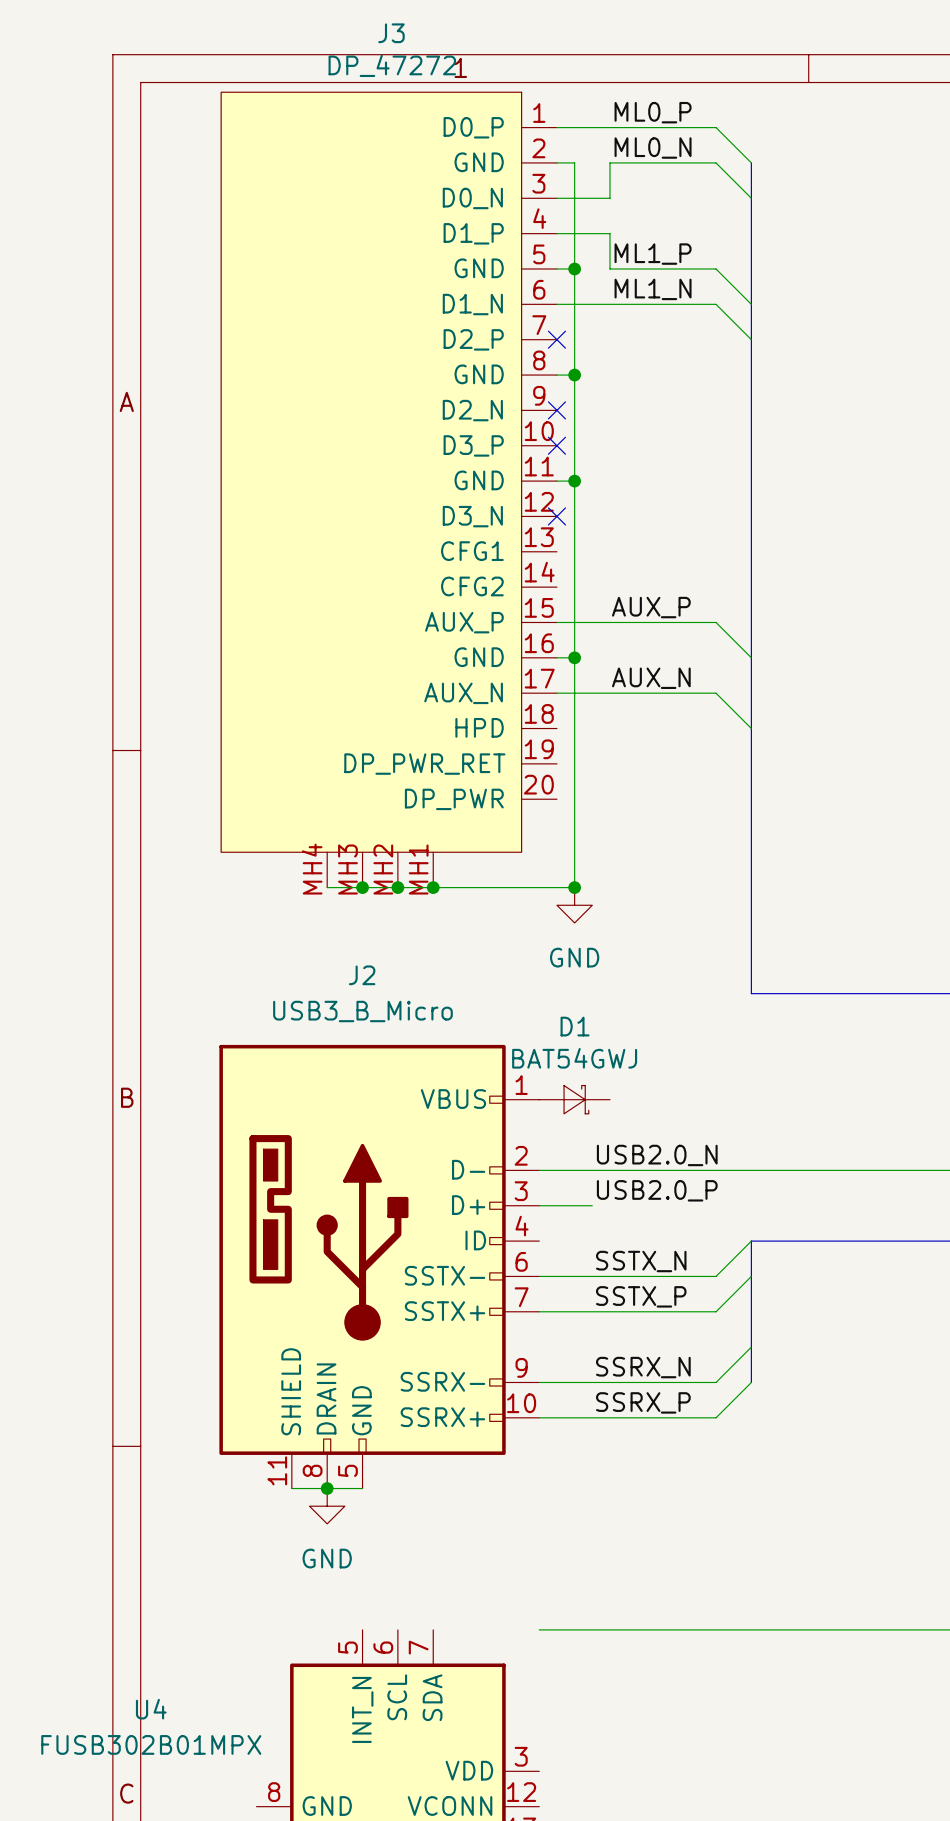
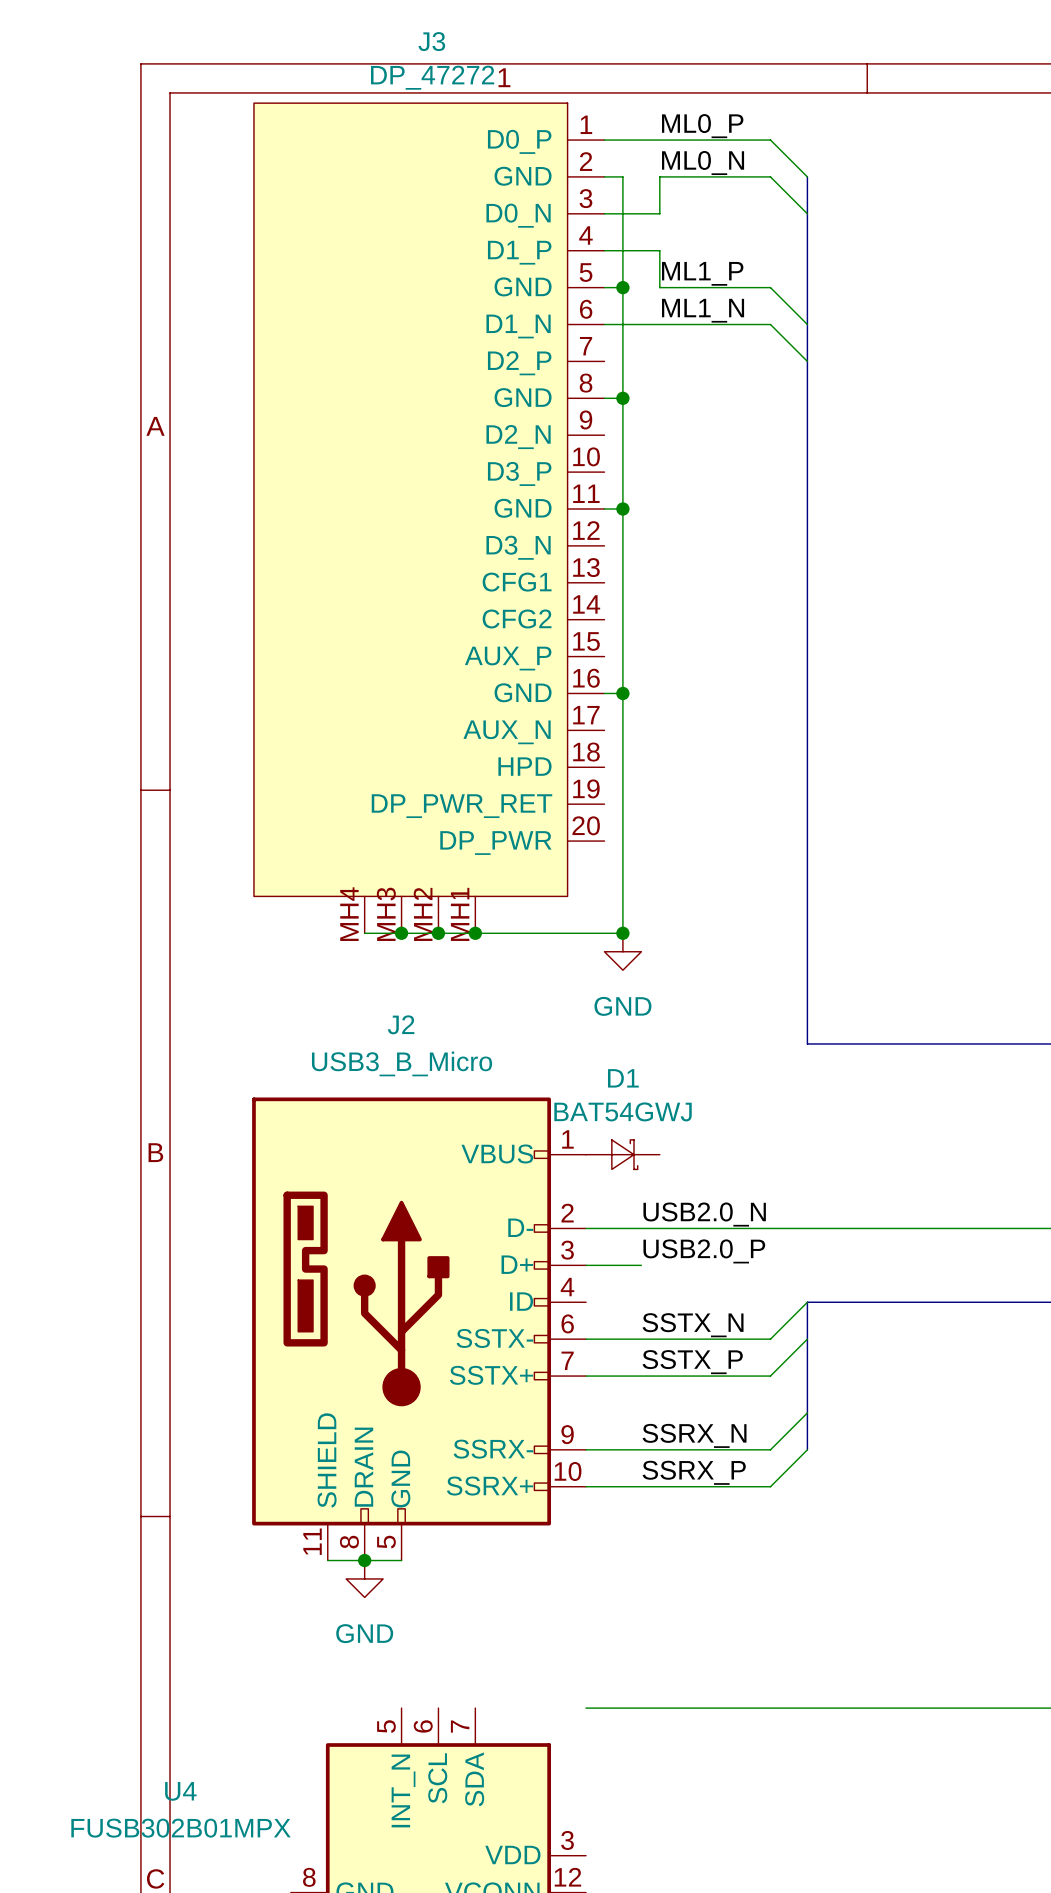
no-connect mark: (556, 339) -> none
no-connect mark: (556, 410) -> none
no-connect mark: (556, 445) -> none
no-connect mark: (556, 516) -> none
label: AUX_P (651, 607) -> none
wire: (556, 622) (716, 622) (751, 657) -> none
label: AUX_N (651, 678) -> none
wire: (556, 693) (716, 693) (751, 728) -> none

